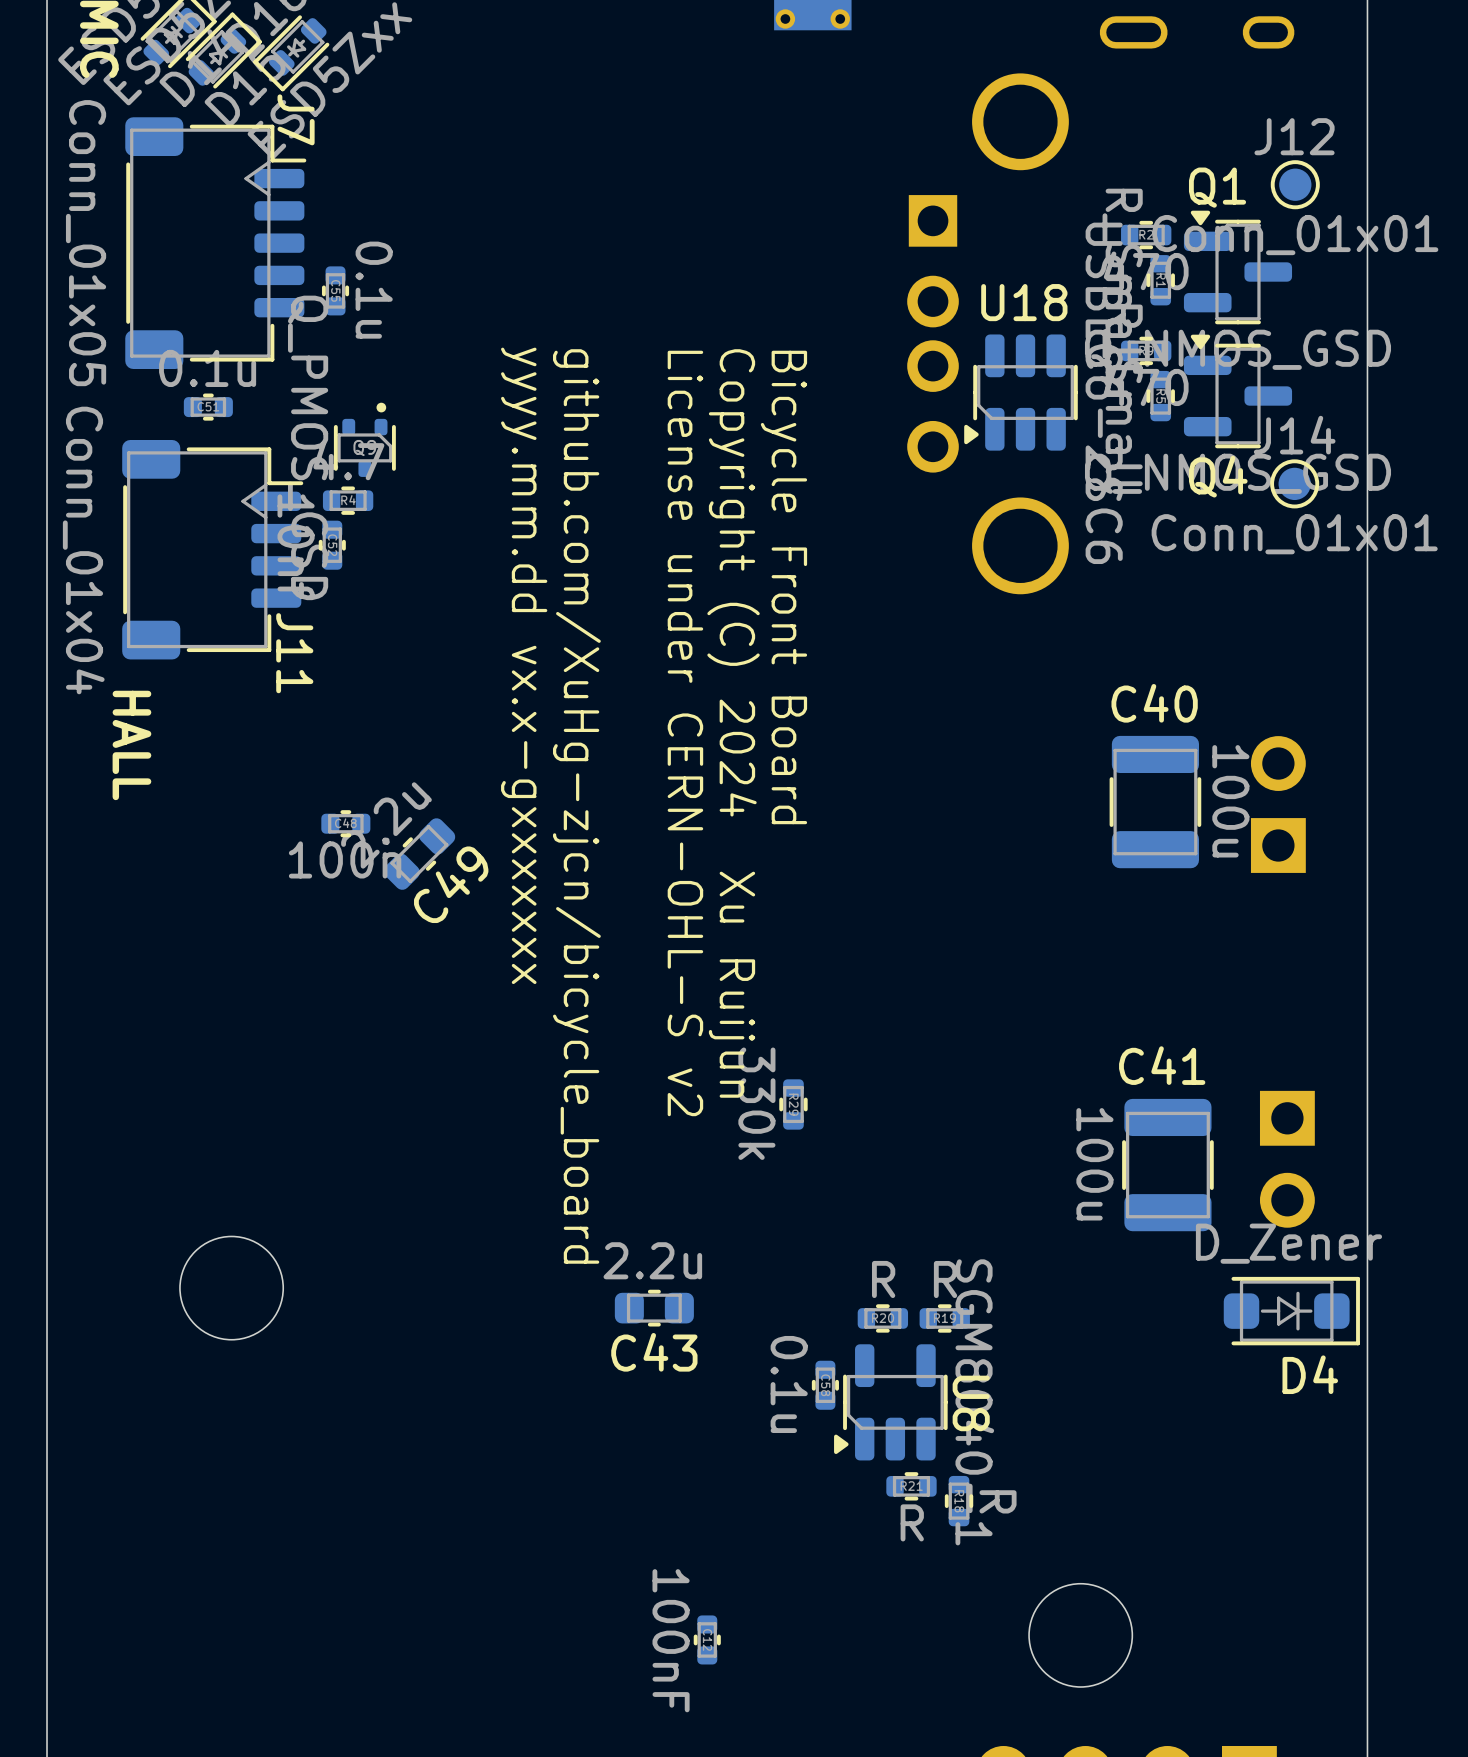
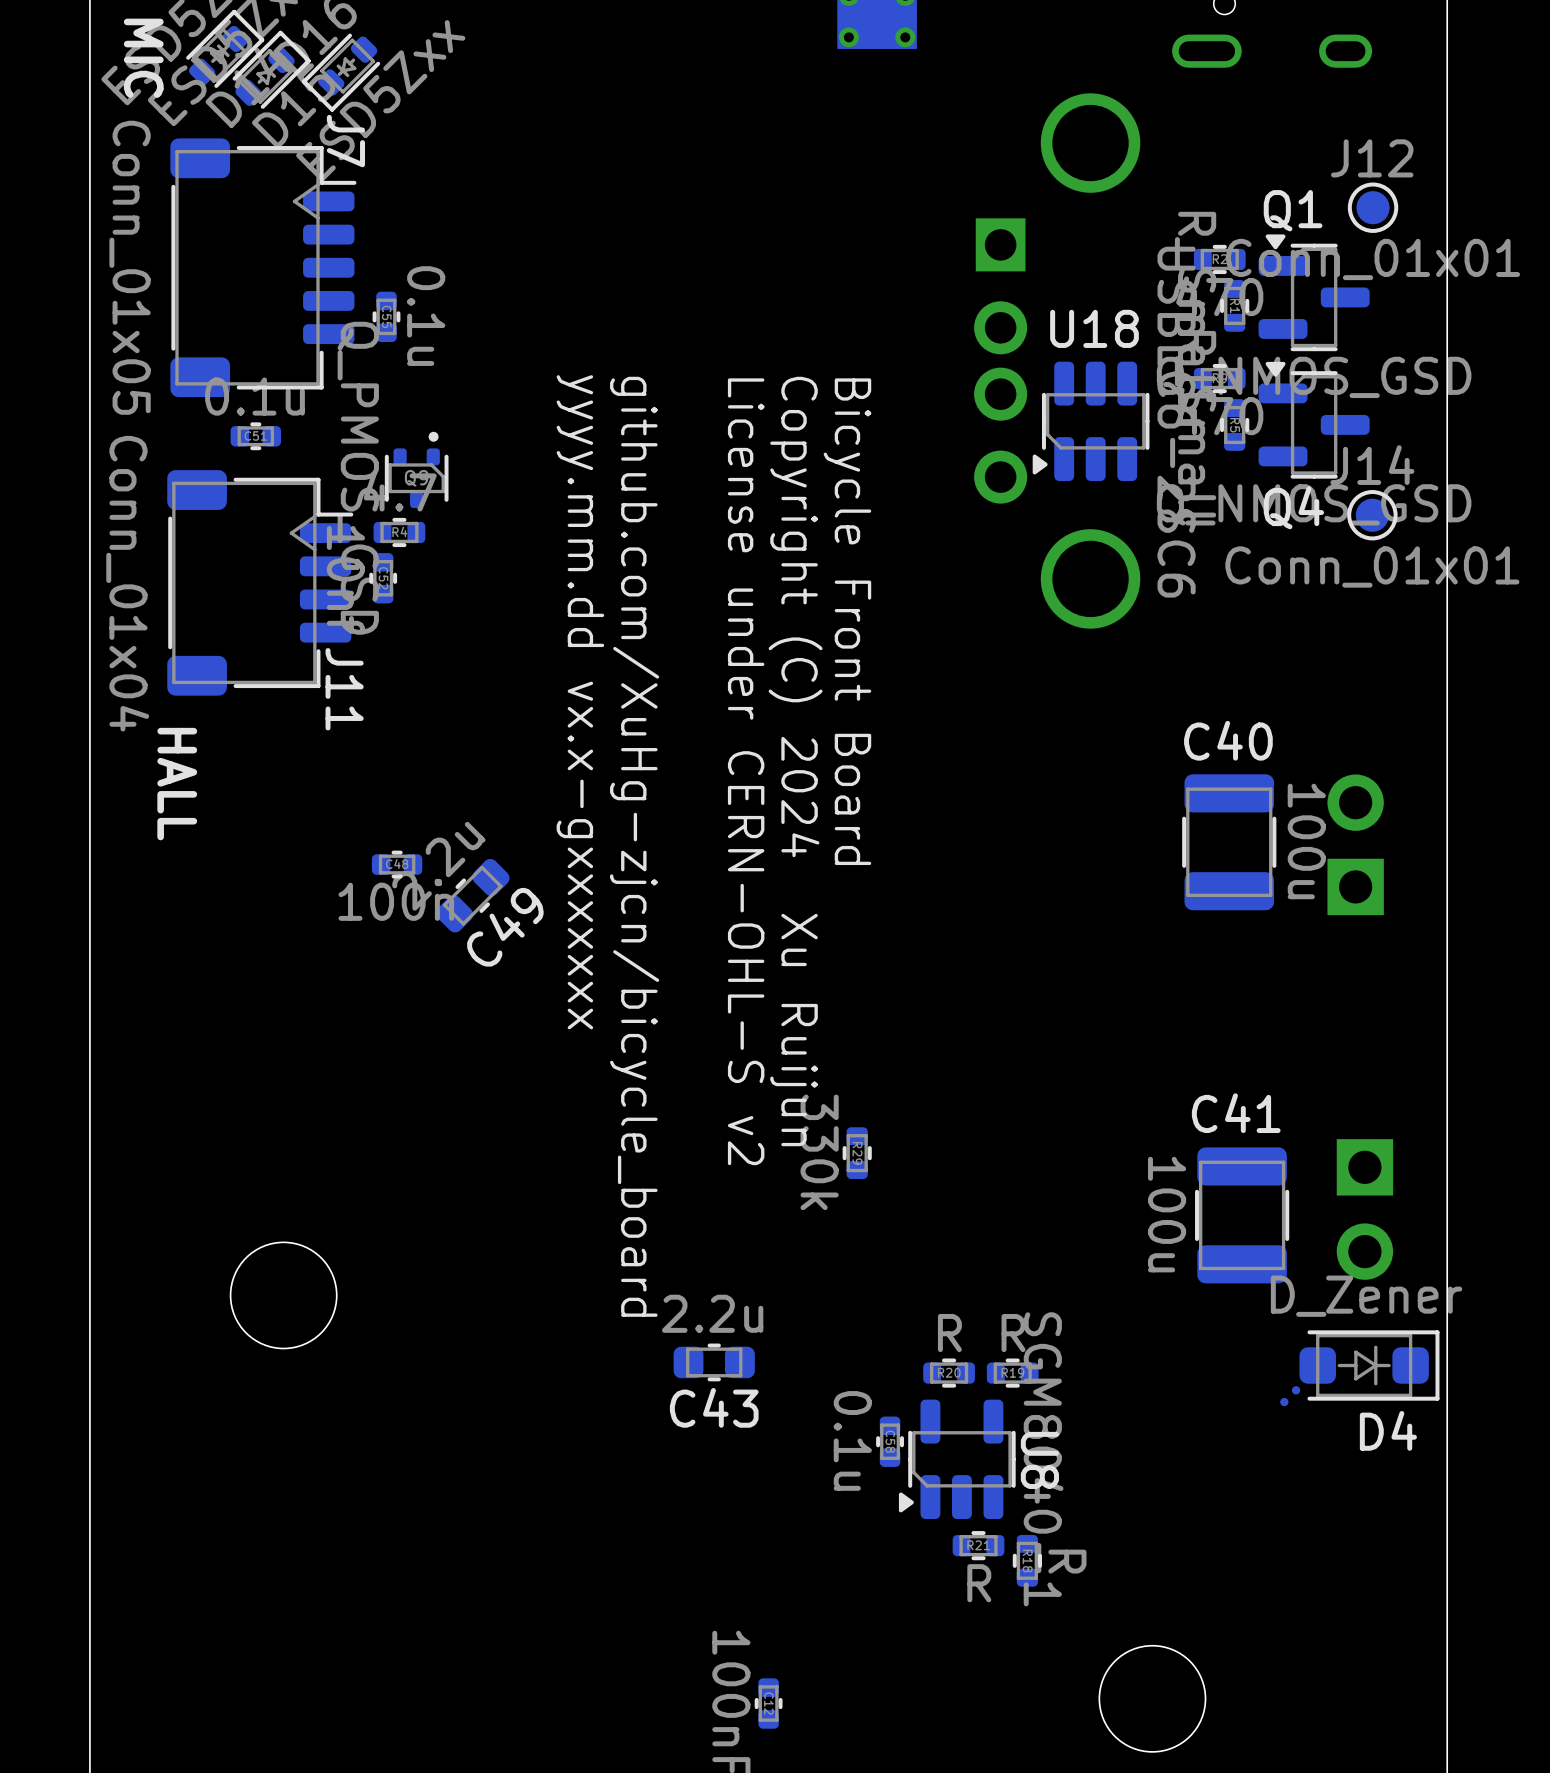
round board edge position: (231, 1288) -> (283, 1295)
part: none -> (1290, 1396)

